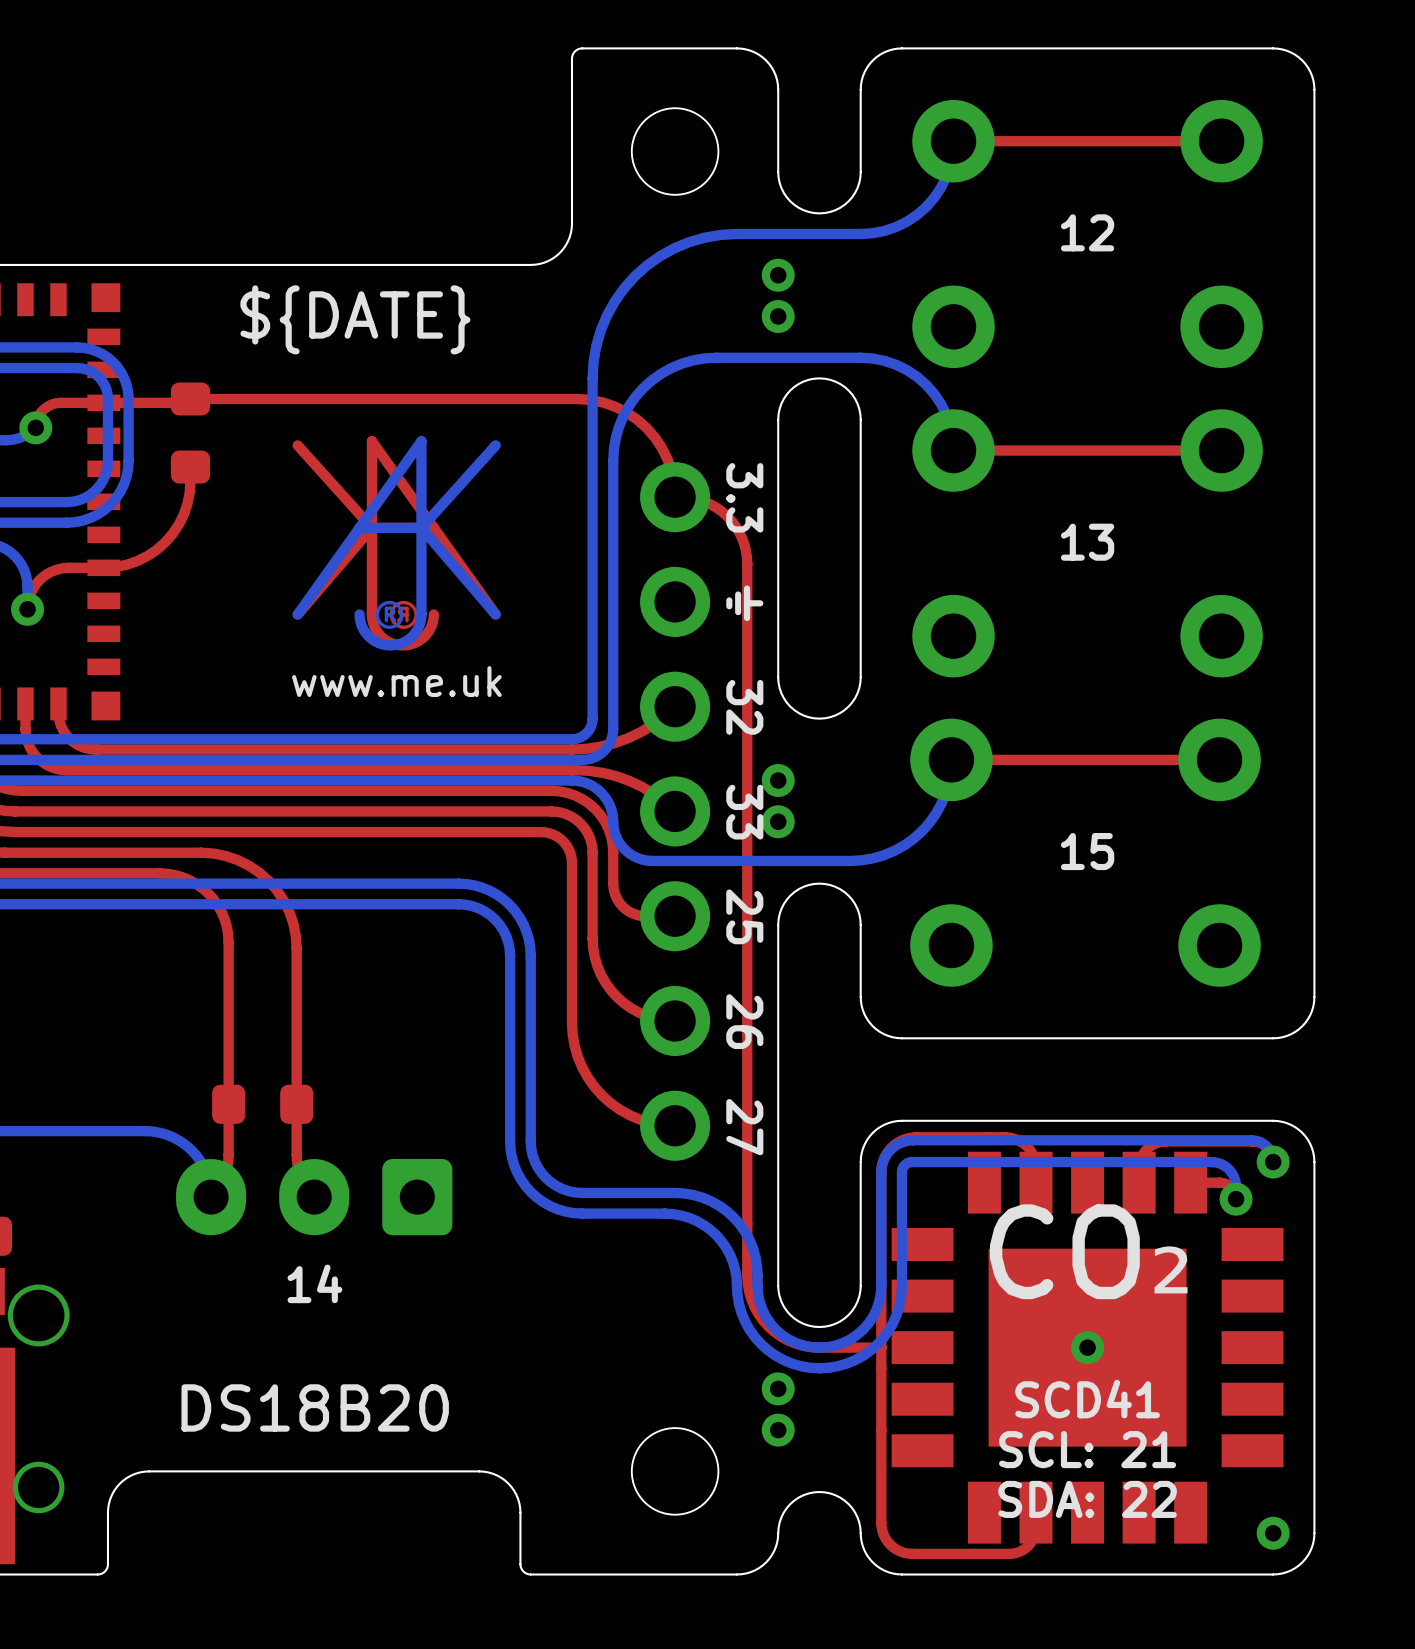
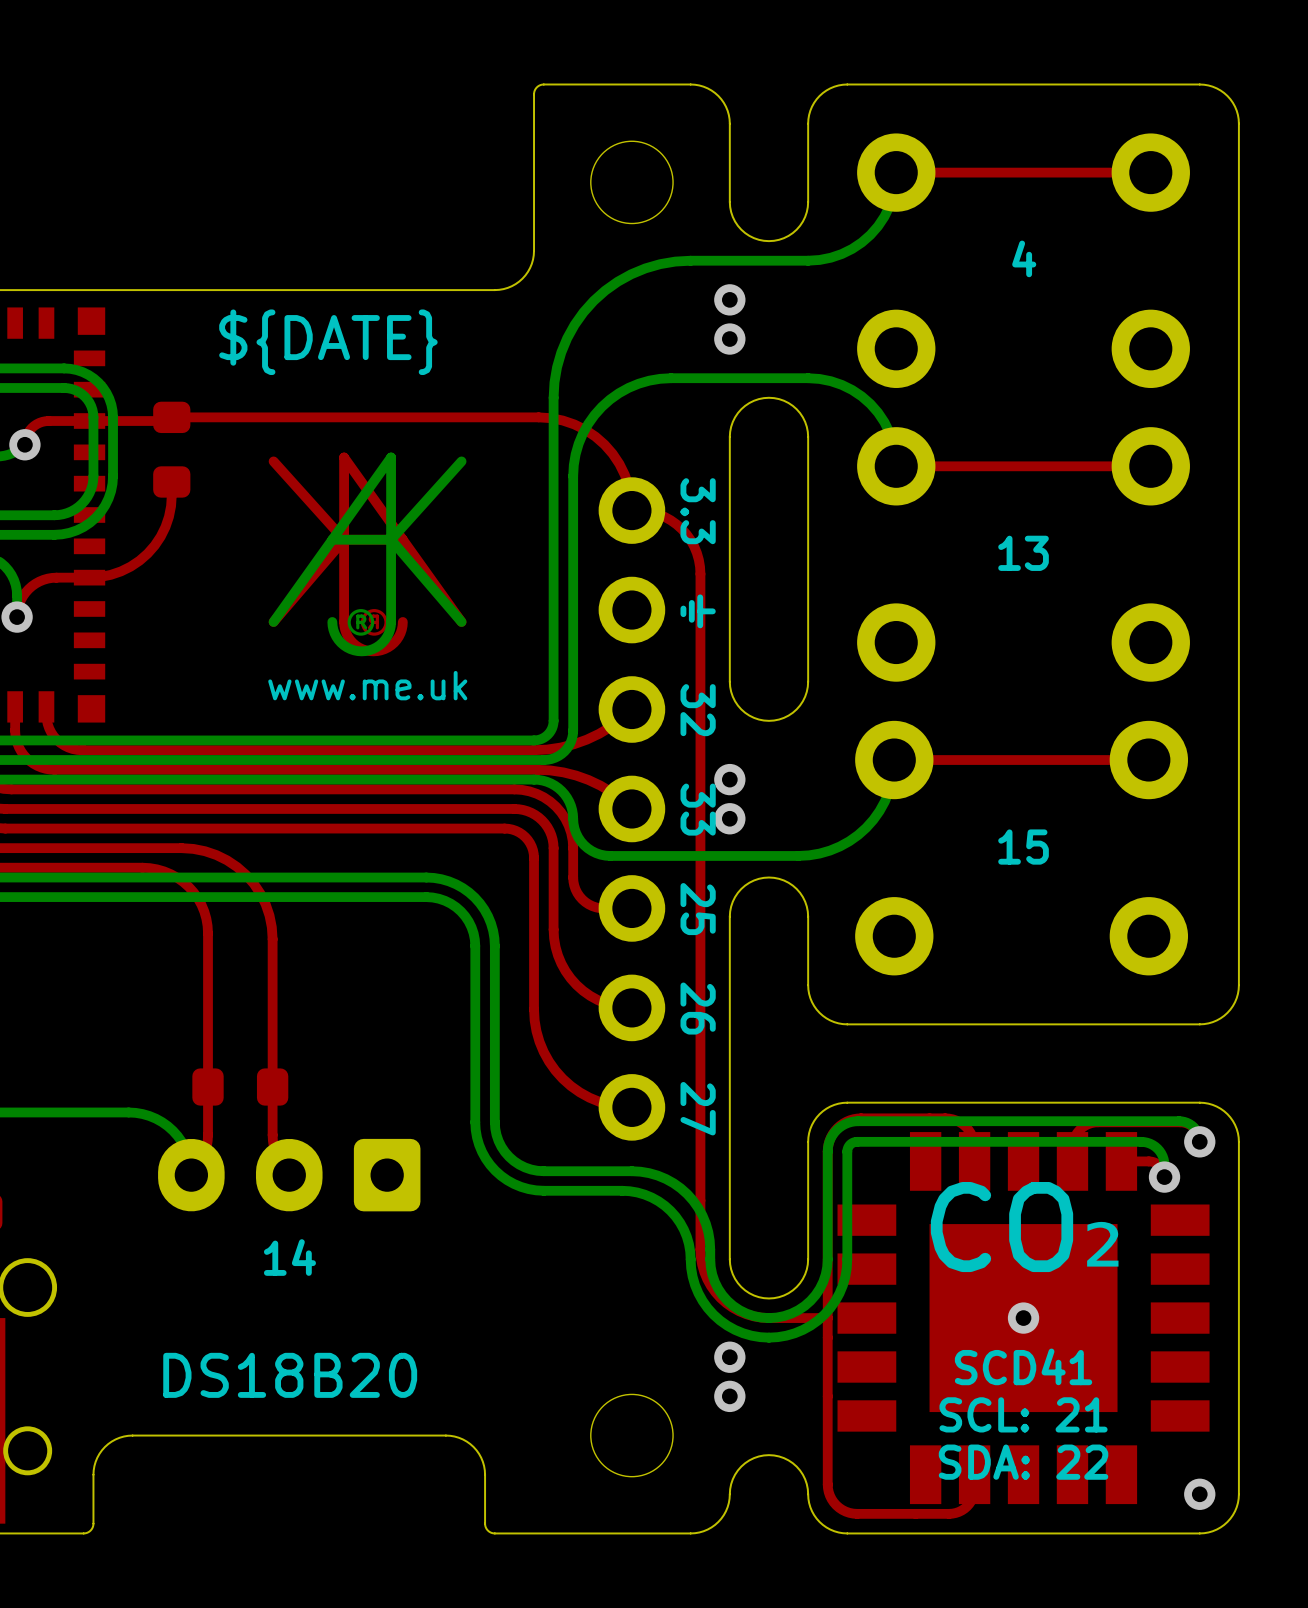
text: 12 (1087, 232) -> 4 (1024, 258)

